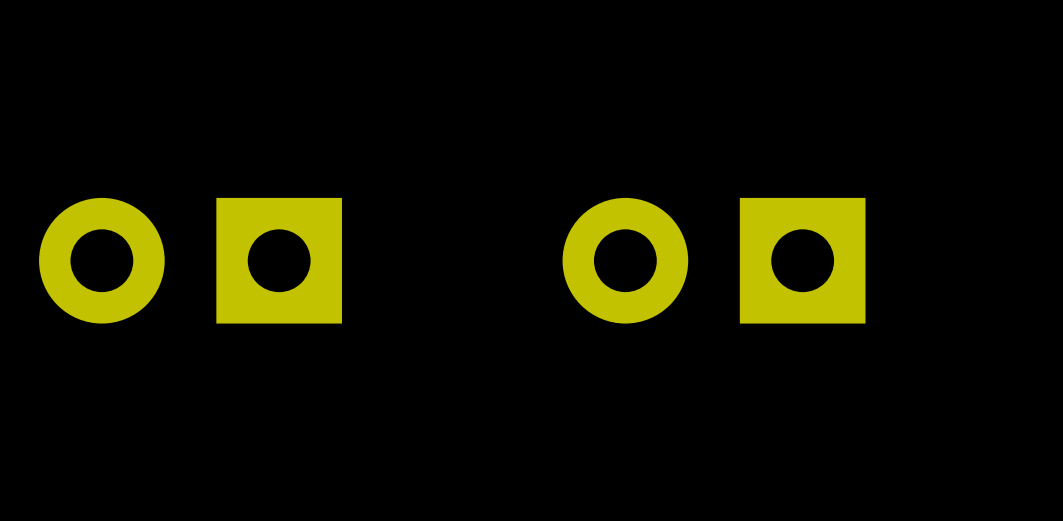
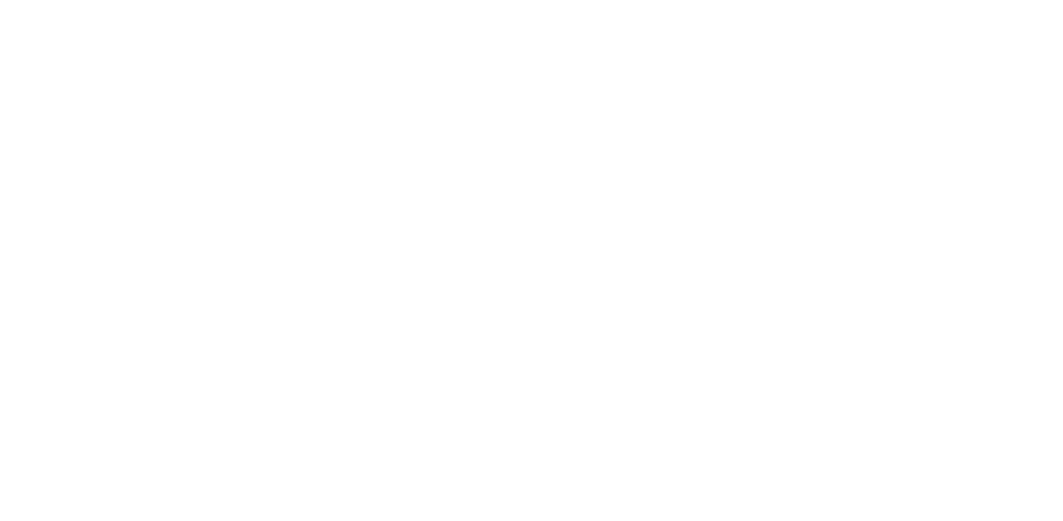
part: (190, 260) -> none
part: (714, 260) -> none

